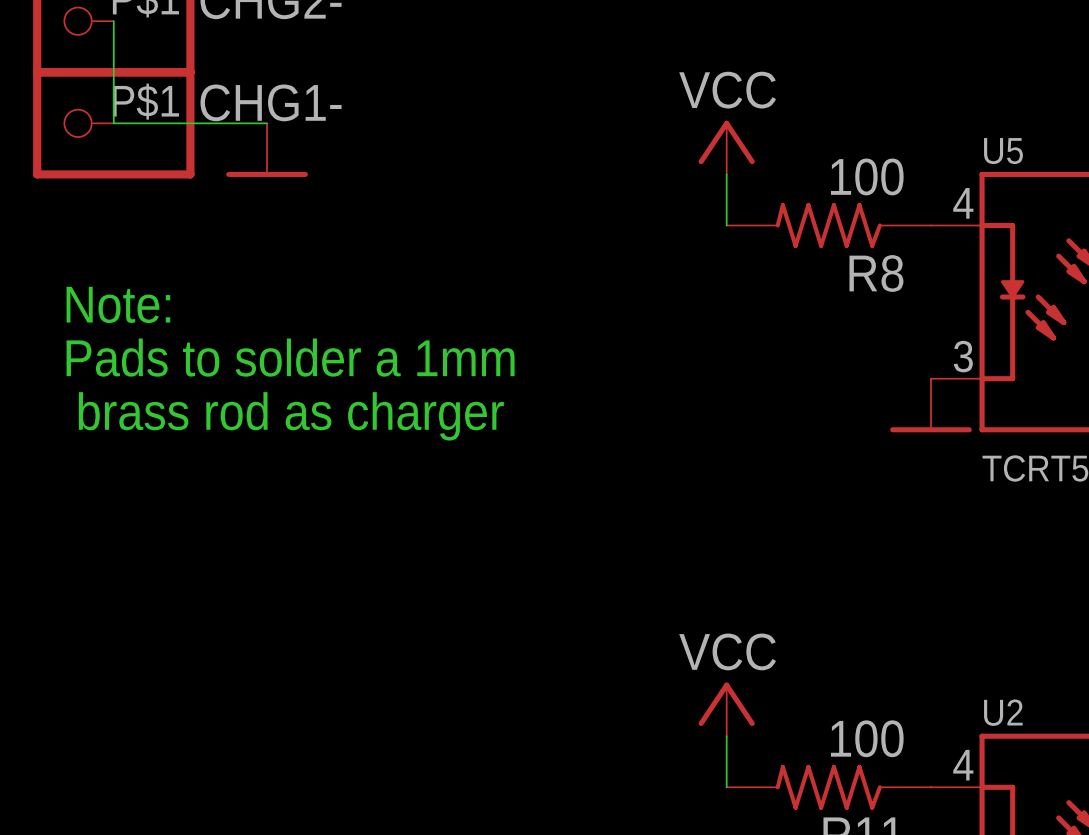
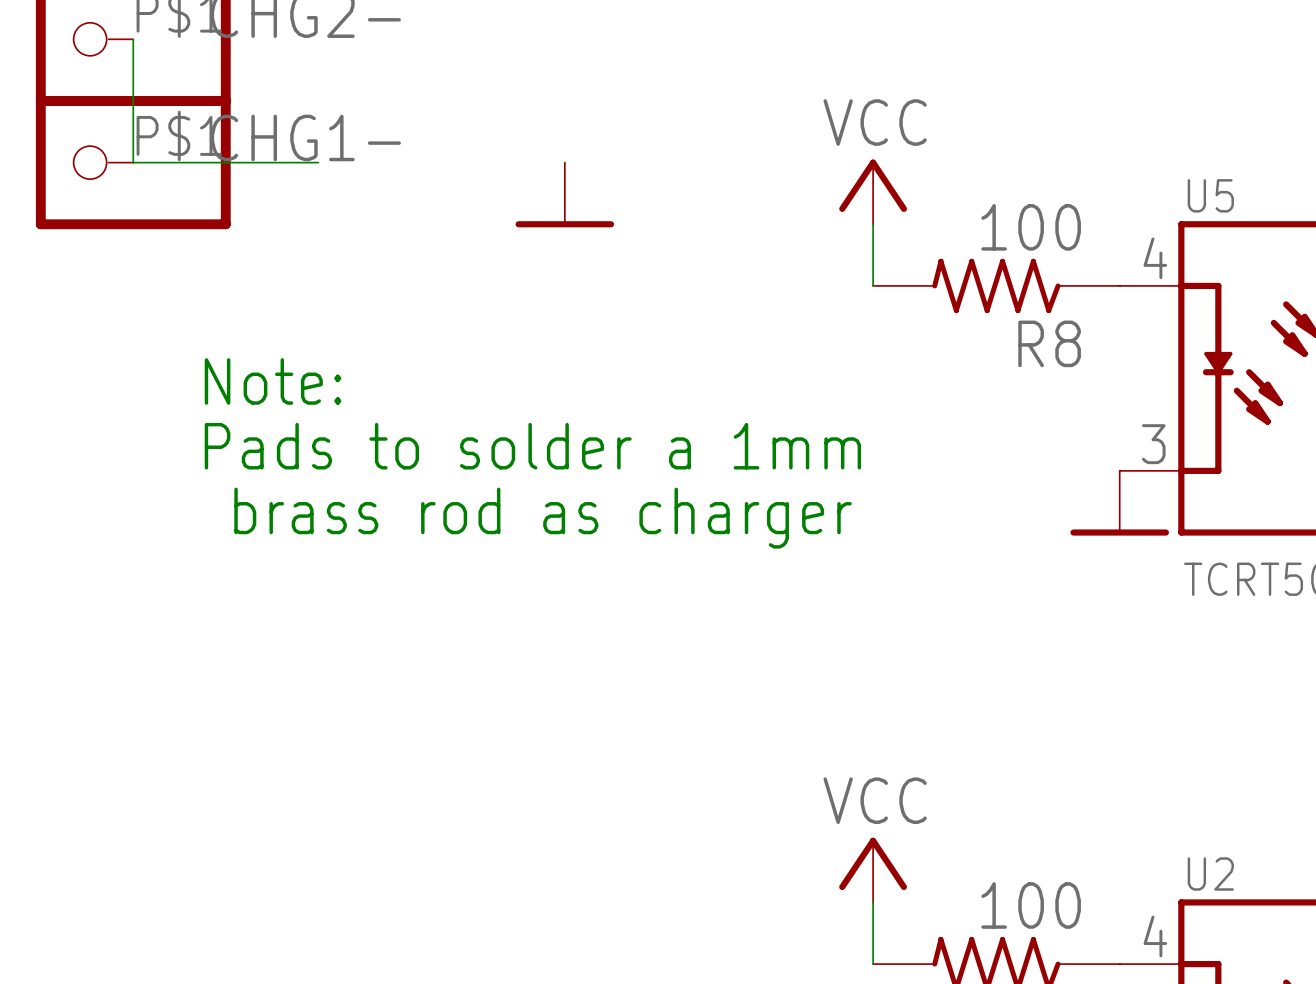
power symbol position: (267, 150) -> (564, 194)
text position: Note: (118, 304) -> Note: (273, 381)
text position: Pads to solder a 1mm (290, 357) -> Pads to solder a 1mm (532, 446)
text position: brass rod as charger (291, 416) -> brass rod as charger (543, 518)

